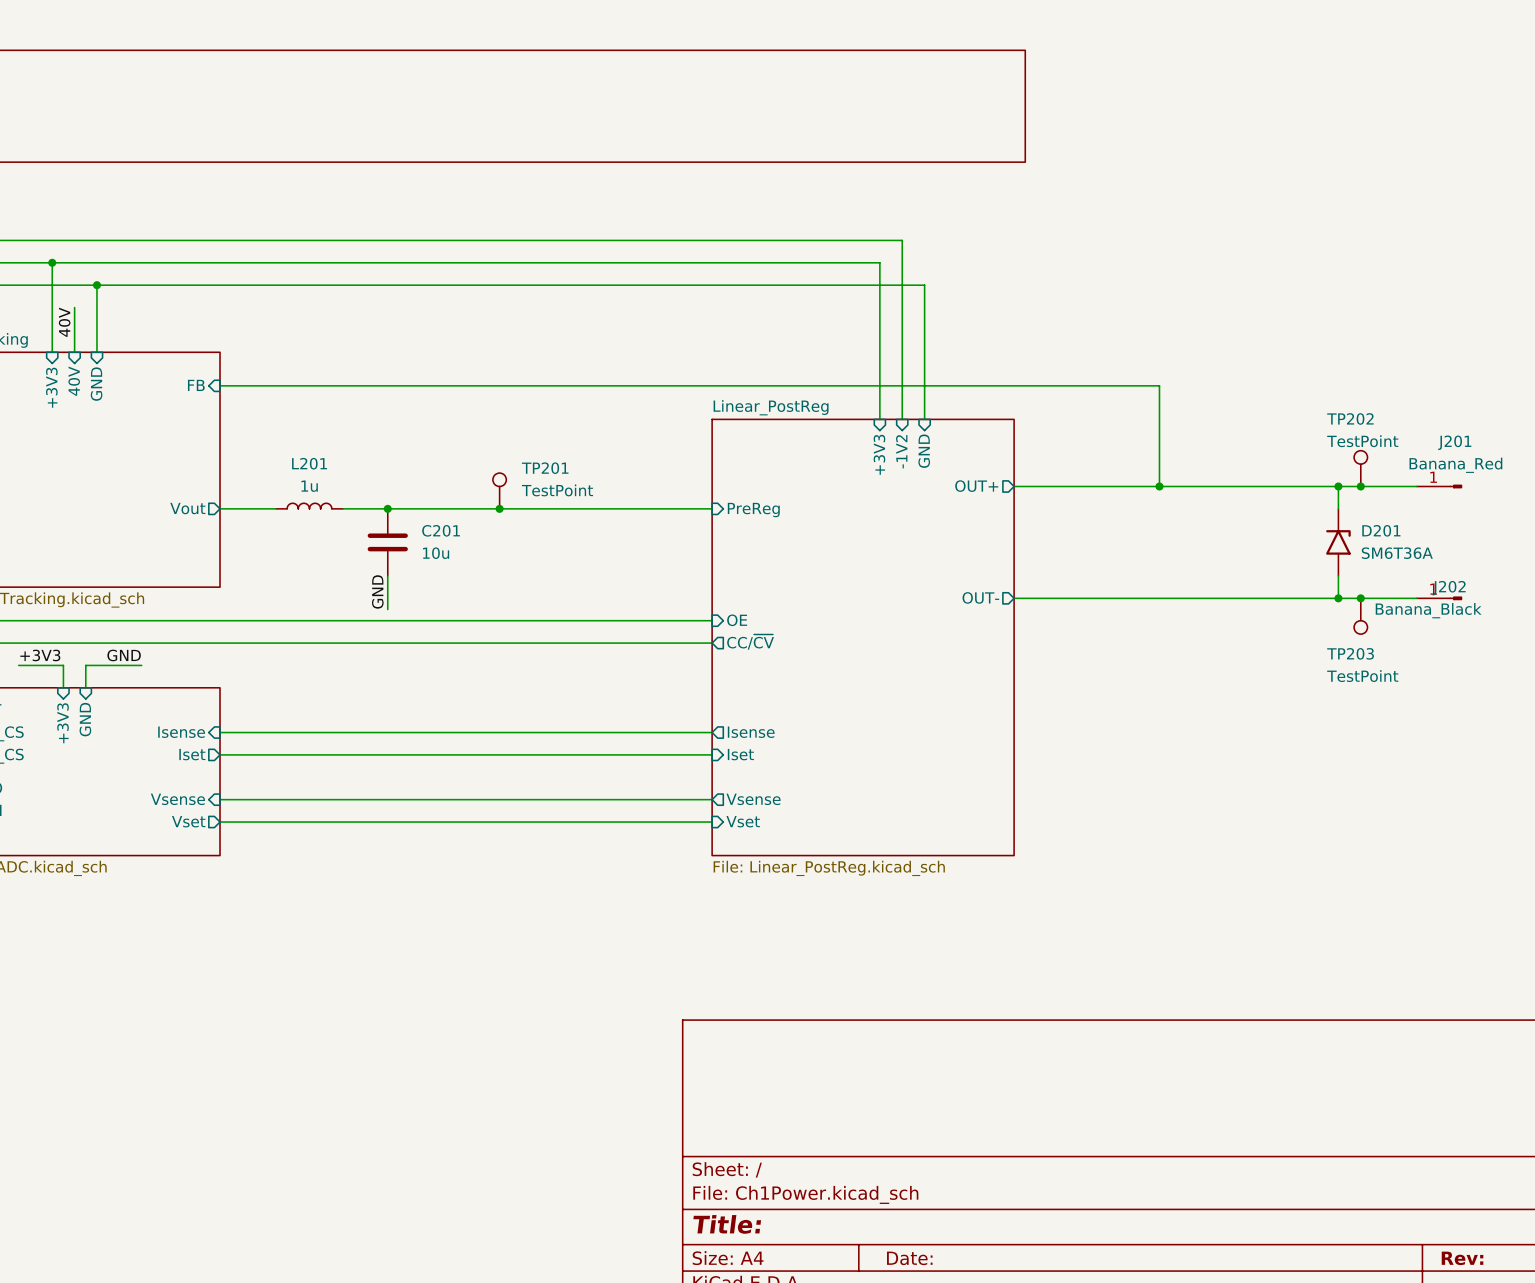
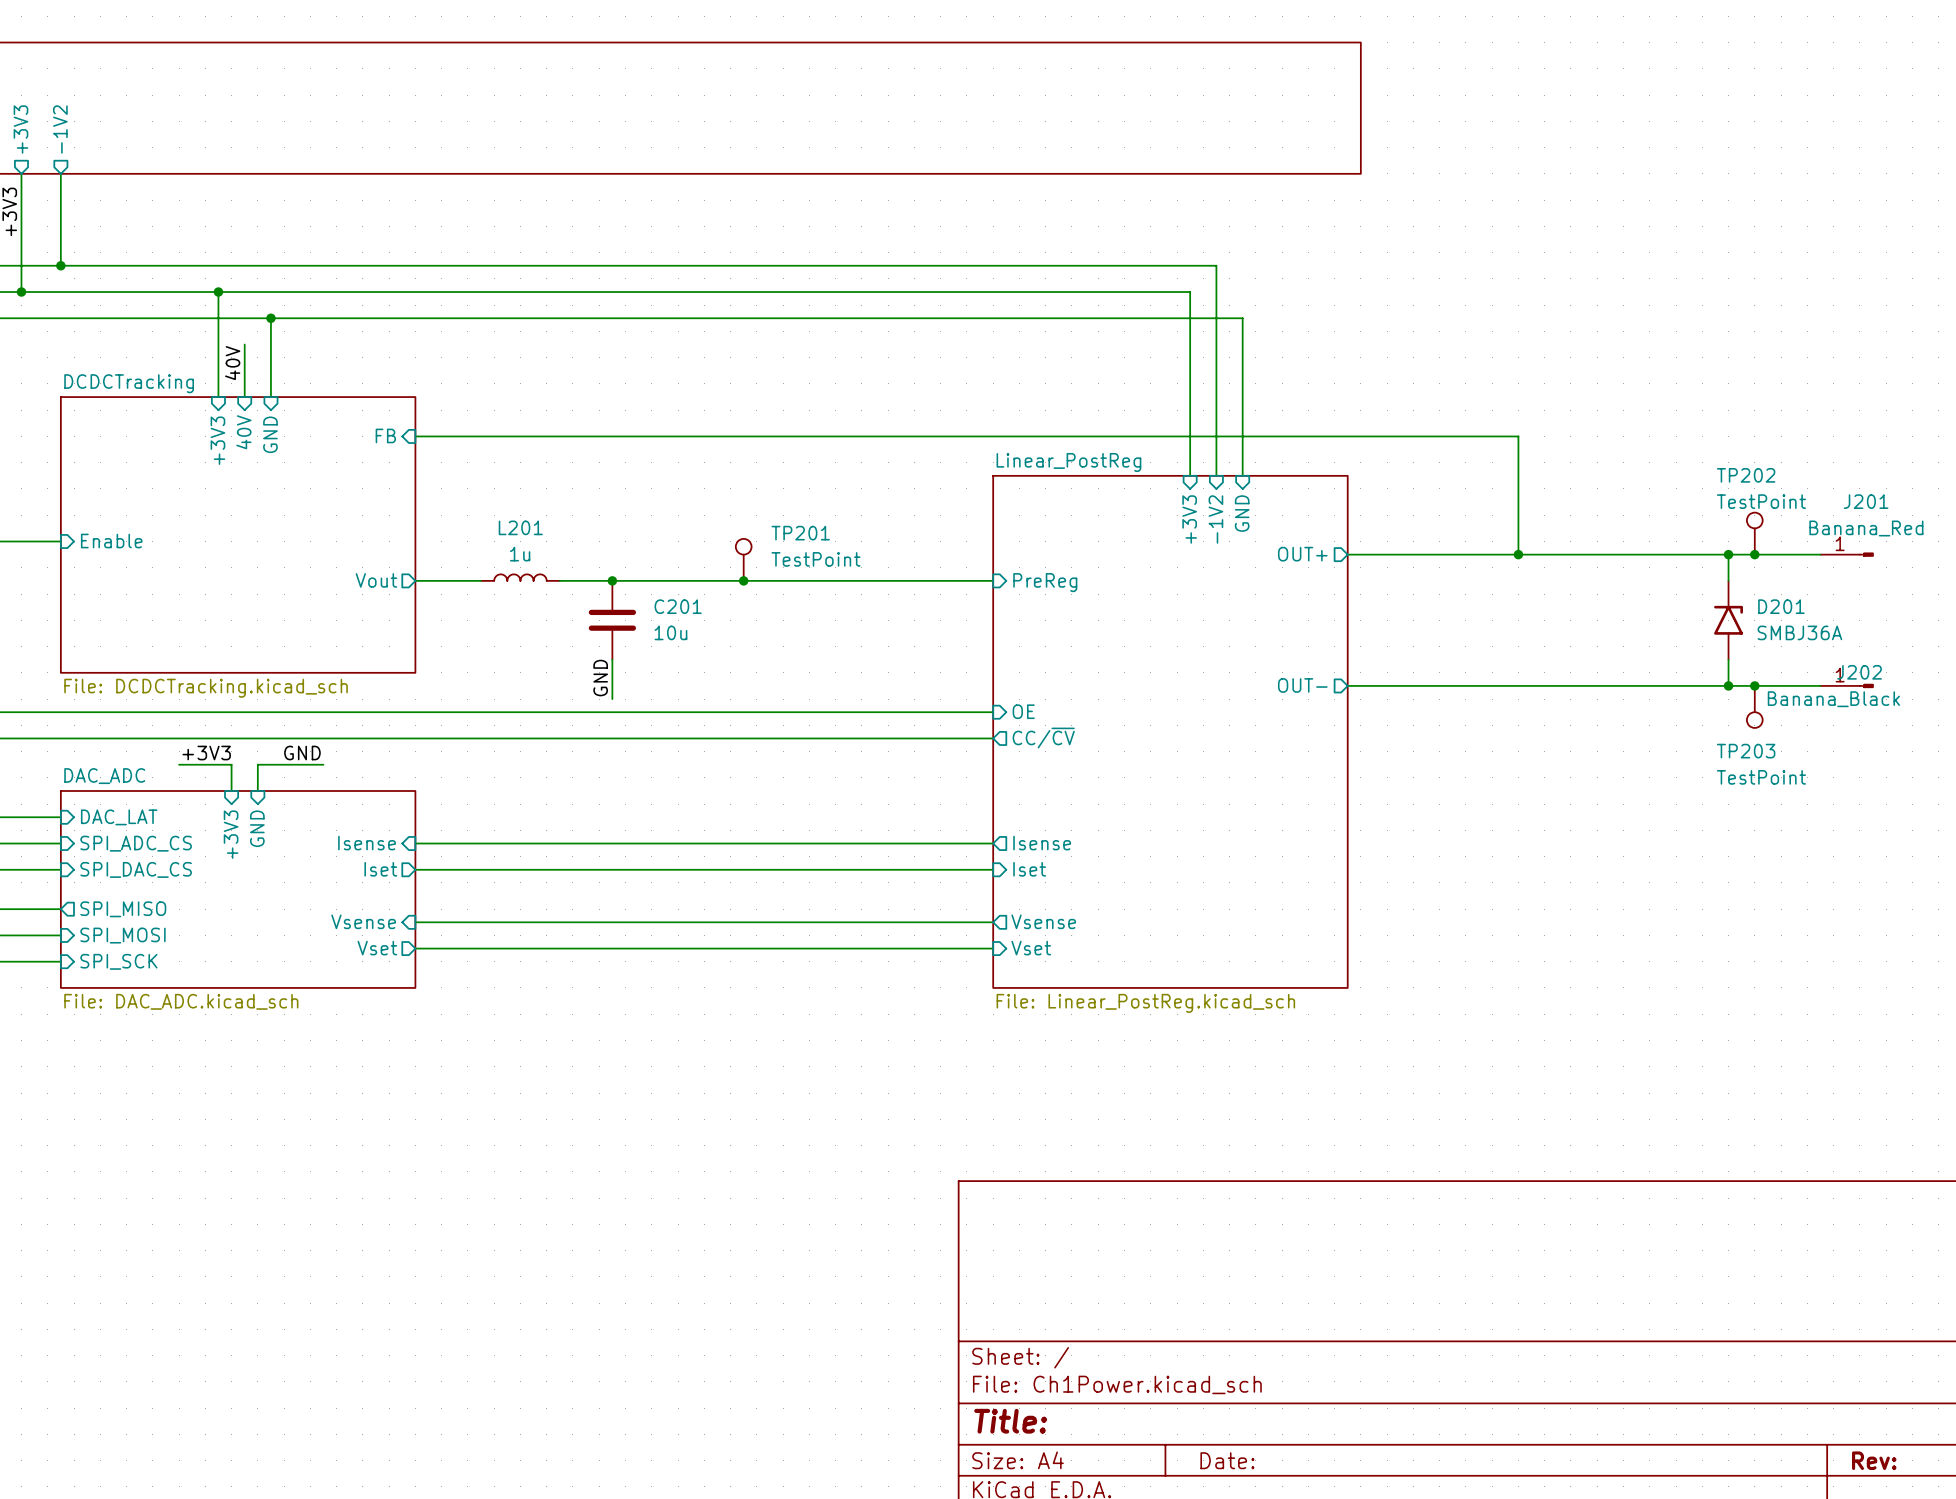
D201 value: SM6T36A (1397, 553) -> SMBJ36A (1799, 632)

